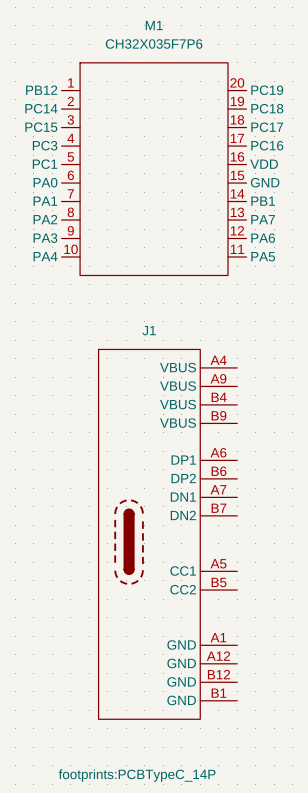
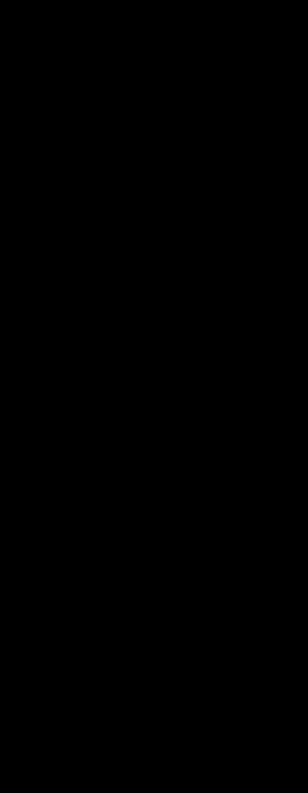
M1: CH32X035F7P6 (154, 169) -> none
J1: (167, 534) -> none

